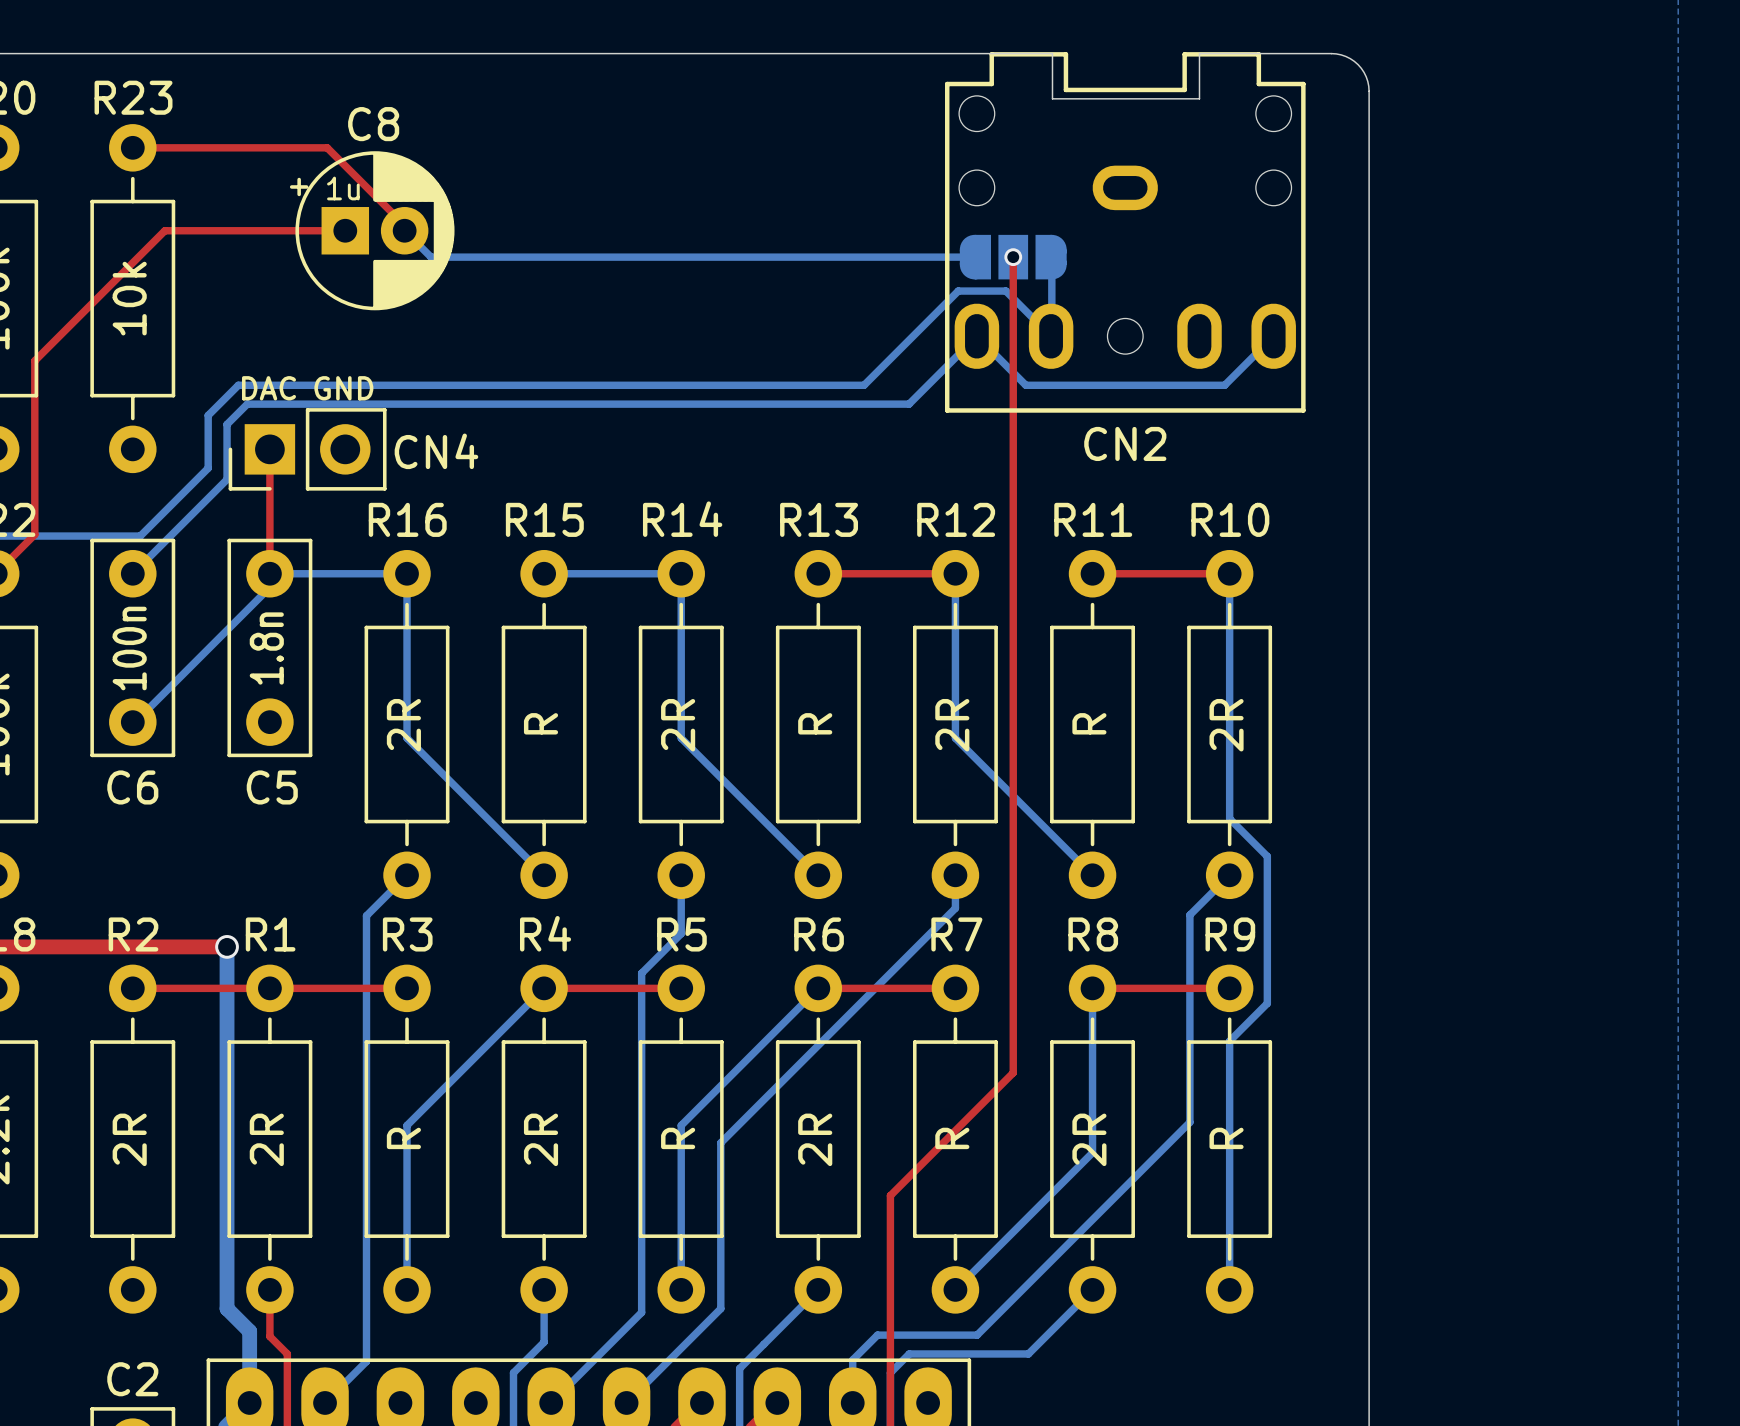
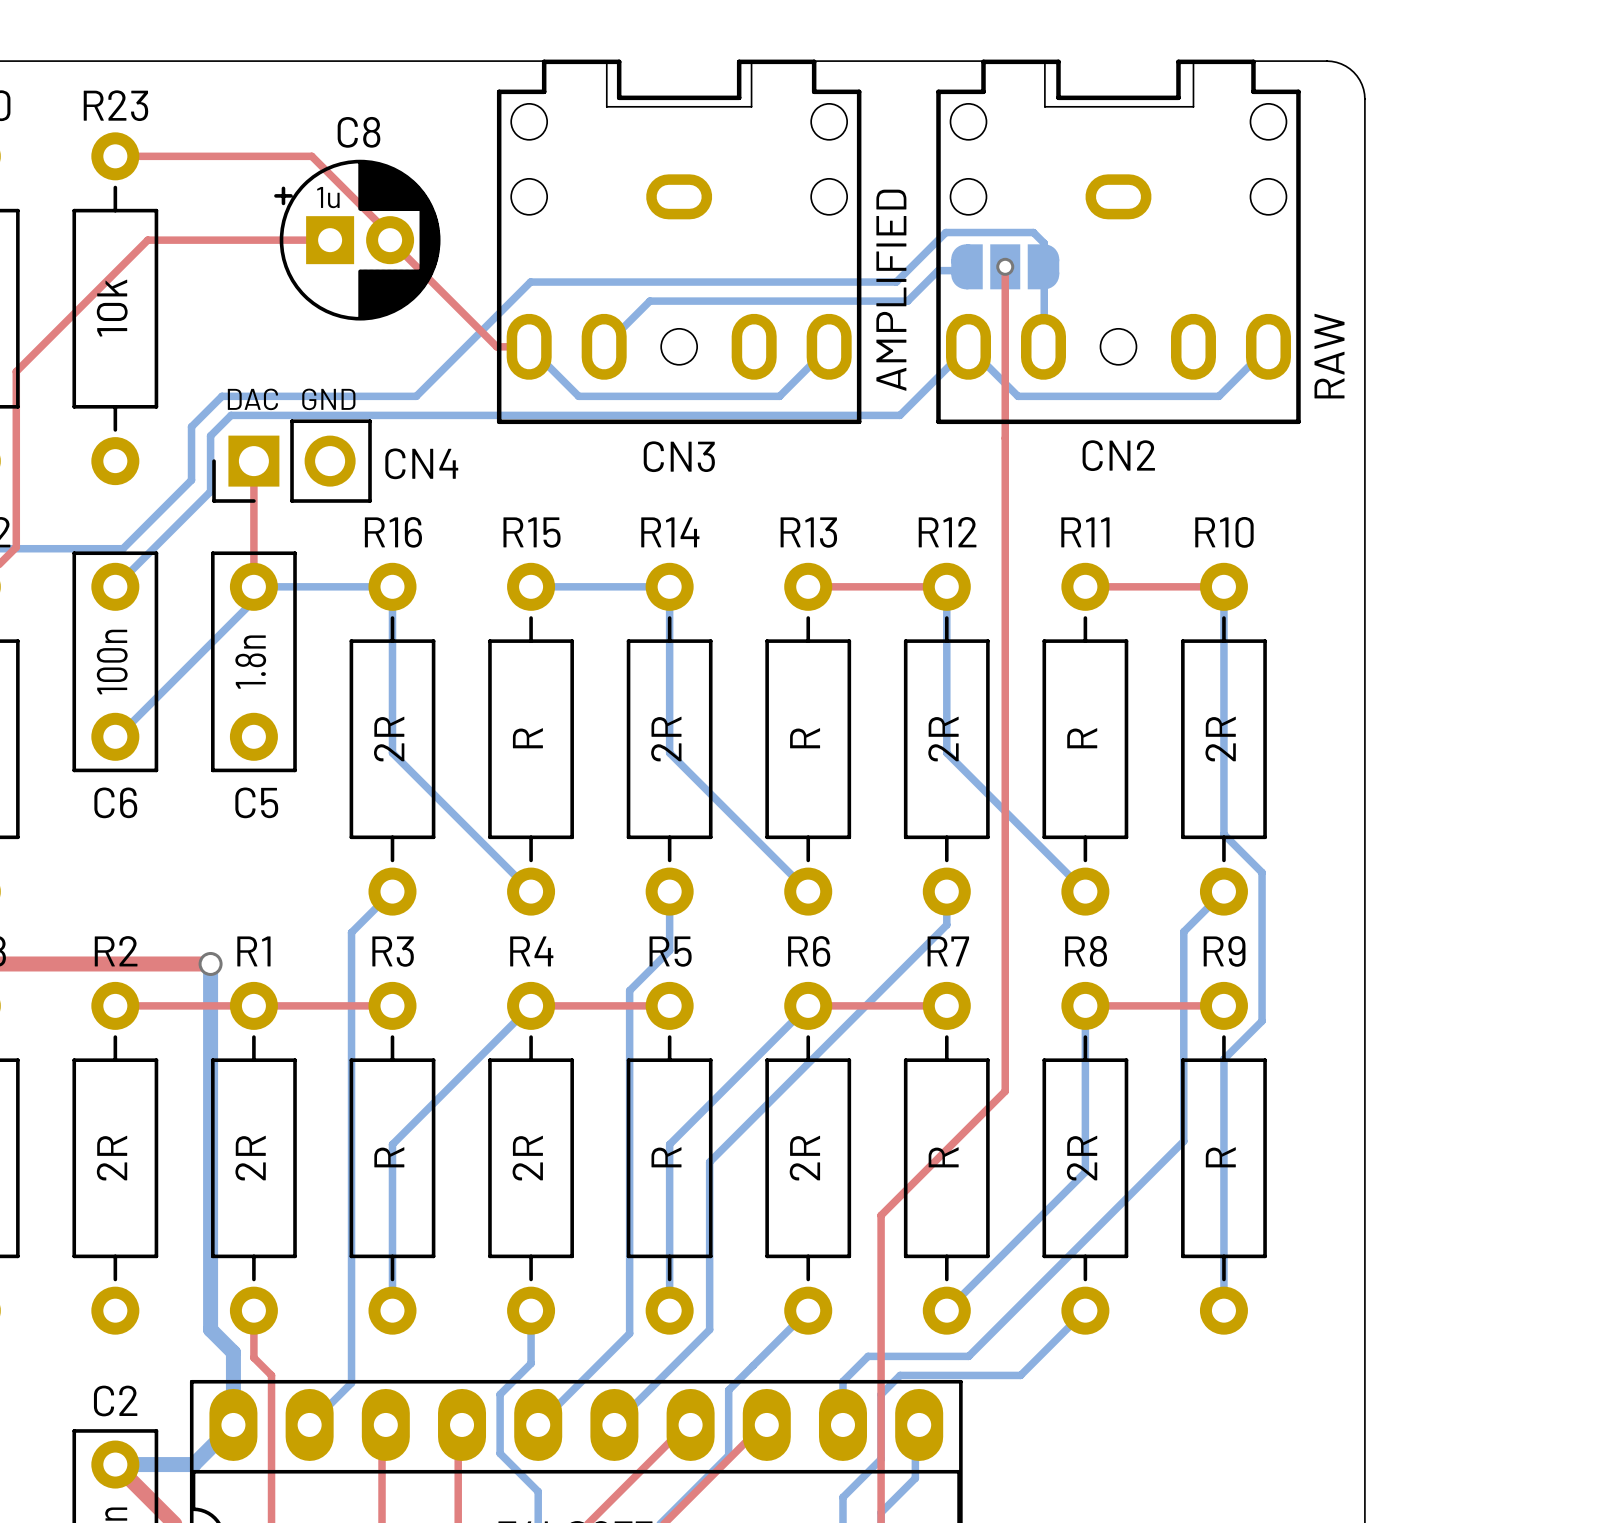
board edge: (619, 53) (762, 53) -> (606, 61) (606, 106) (751, 106) (751, 61)
bottom track: (404, 230) (431, 257) (970, 257) (974, 253) -> none
top track: none -> (390, 240) (496, 346) (529, 346)
CN3: none -> (679, 241)
bottom track: none -> (966, 270) (938, 270) (907, 301) (649, 301) (604, 346)
bottom track: none -> (1044, 270) (1044, 243) (1033, 232) (945, 232) (896, 282) (530, 282) (416, 396)
text: none -> AMPLIFIED (891, 290)
bottom track: (1051, 336) (1005, 291) (958, 291) (864, 385) (790, 385) -> (829, 346) (779, 396)
text: none -> RAW (1329, 356)
bottom track: (430, 385) (591, 385) -> (529, 346) (578, 396)

